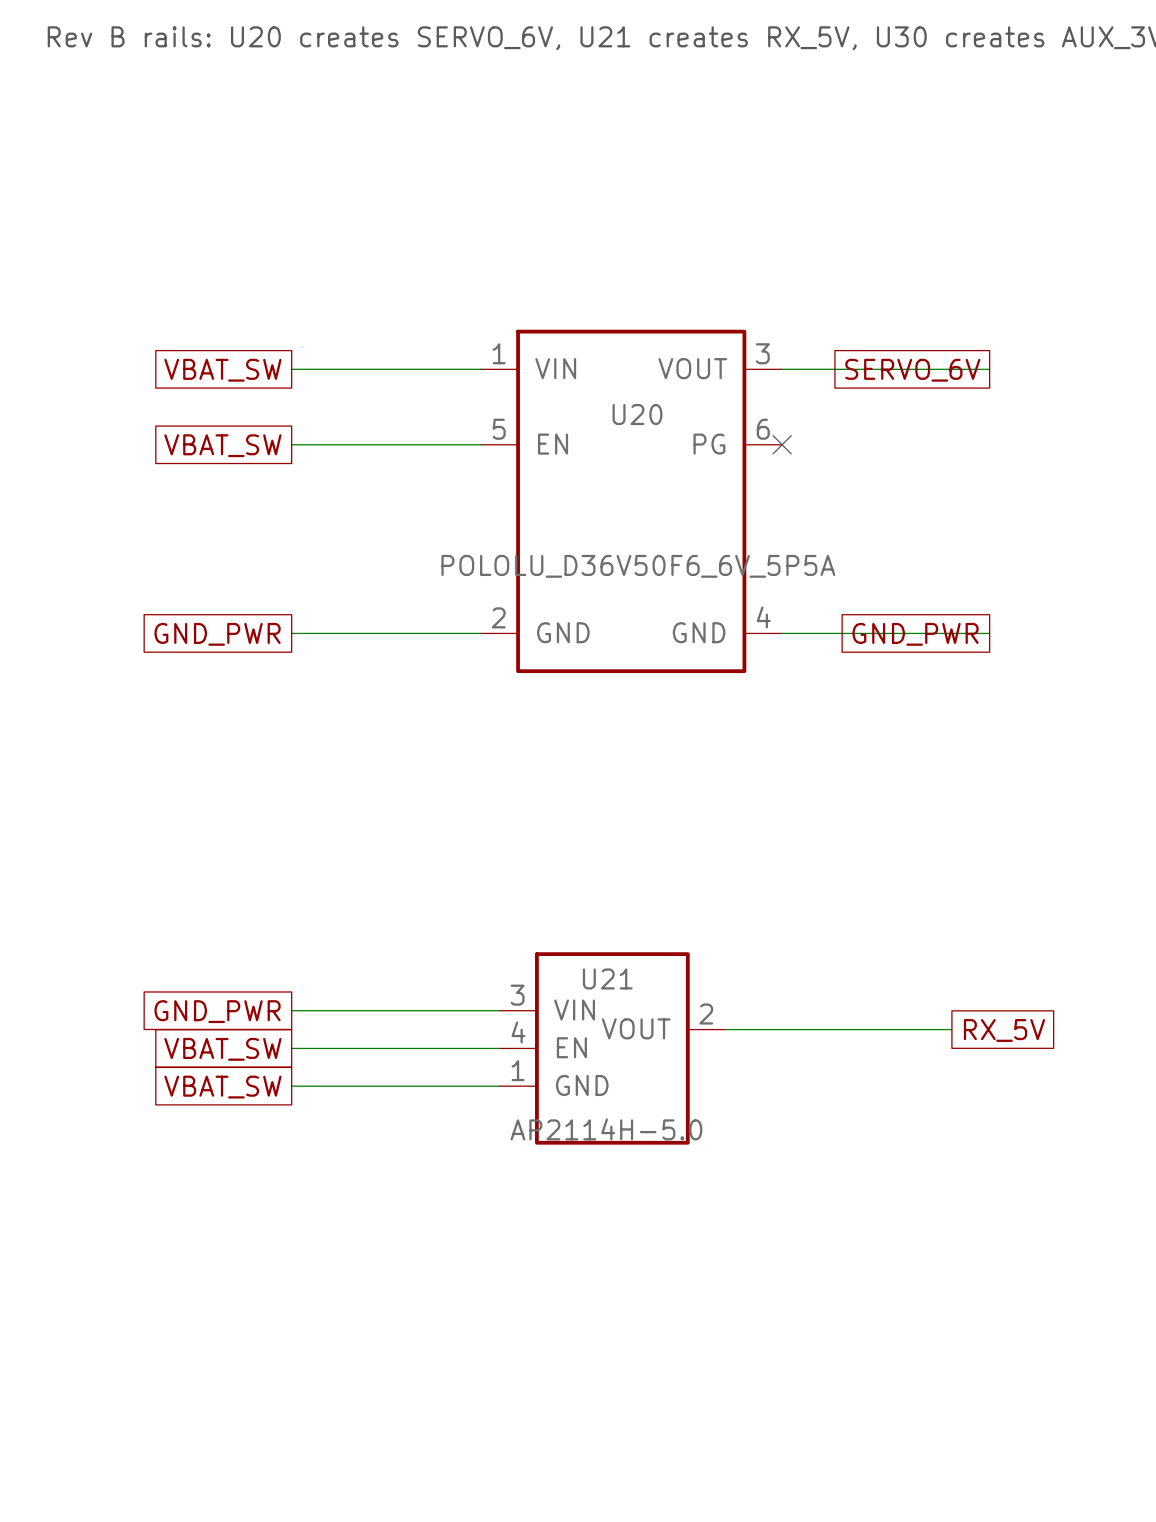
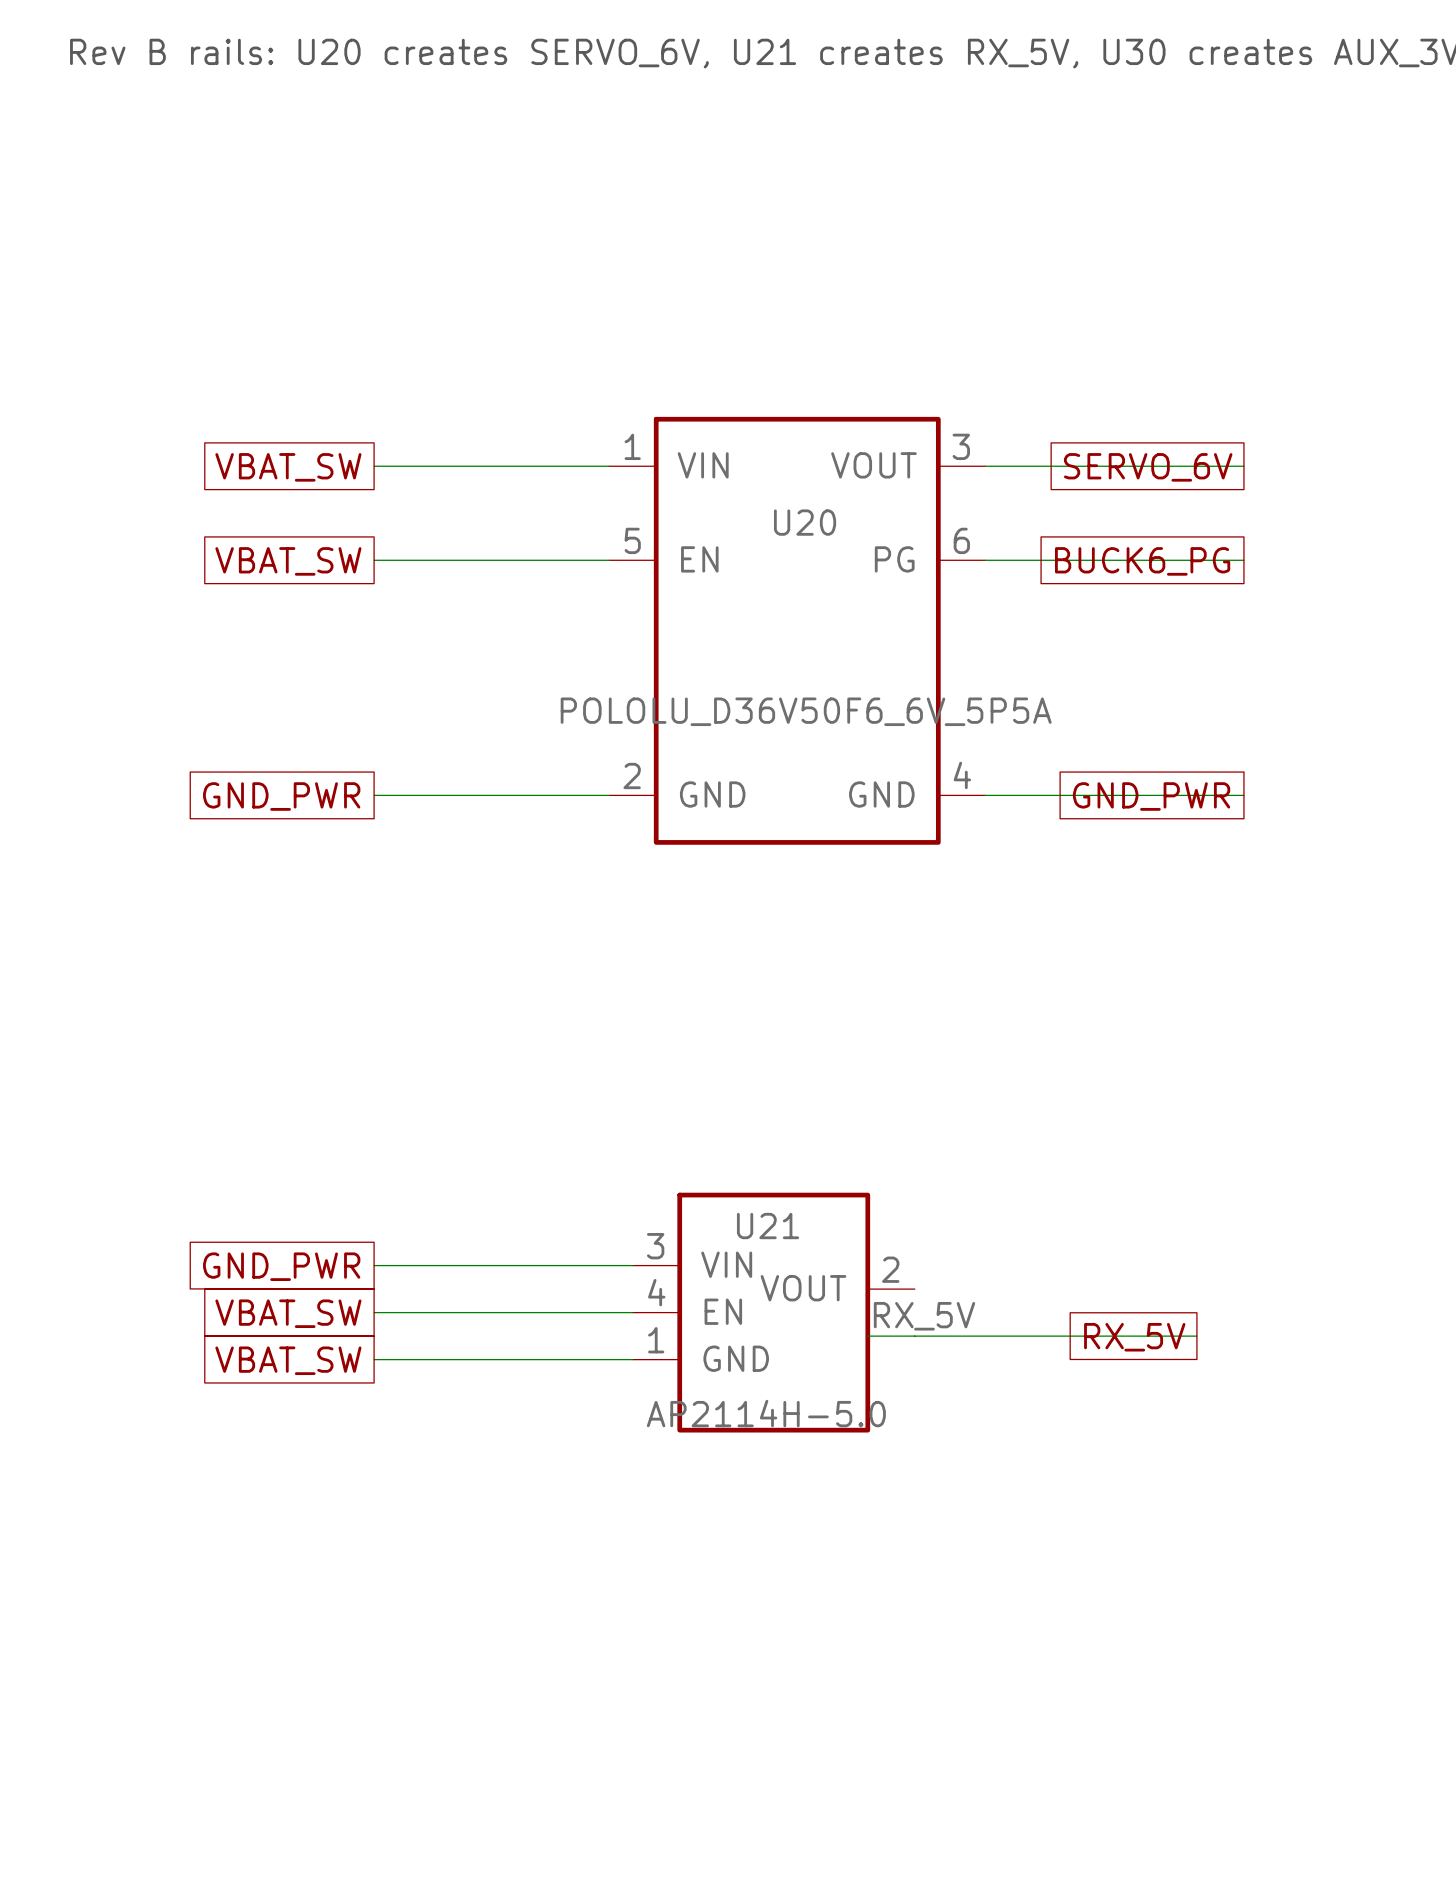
wire: none -> (985, 560) (1243, 560)
no-connect mark: (782, 444) -> none
global label: none -> BUCK6_PG (1142, 561)
wire: (725, 1029) (951, 1029) -> none
global label rotation: 0° (1004, 1030) -> 180° (1134, 1337)
global label position: RX_5V (1004, 1030) -> RX_5V (1134, 1337)
label: none -> RX_5V (924, 1316)
wire: none -> (867, 1336) (1196, 1336)

